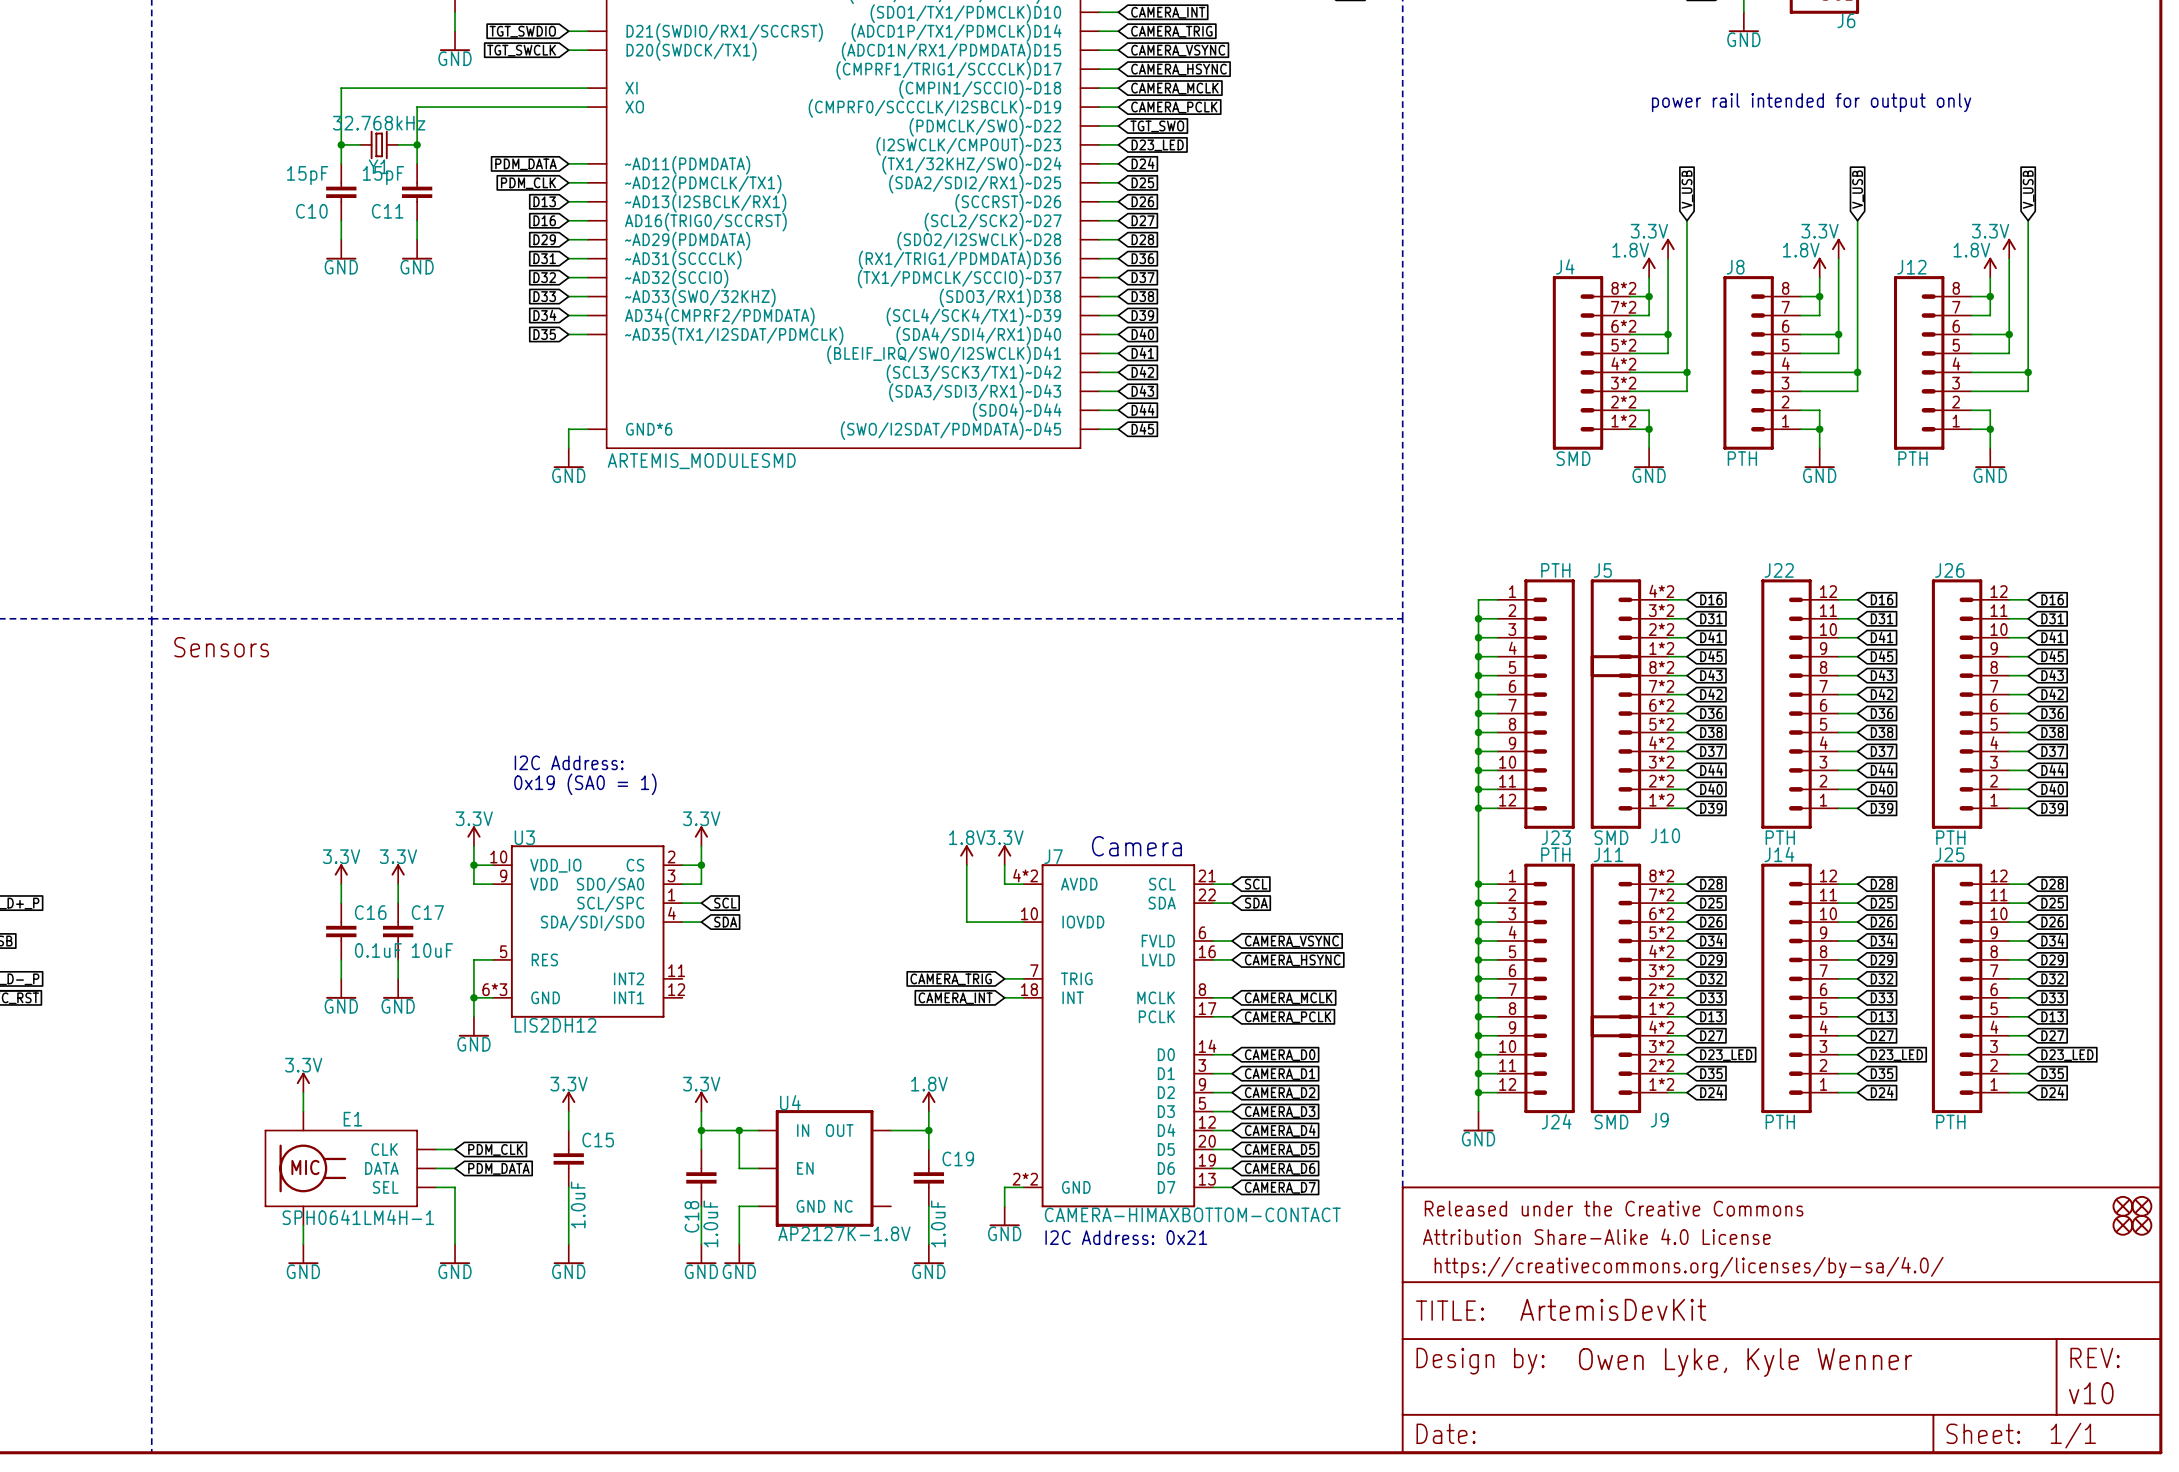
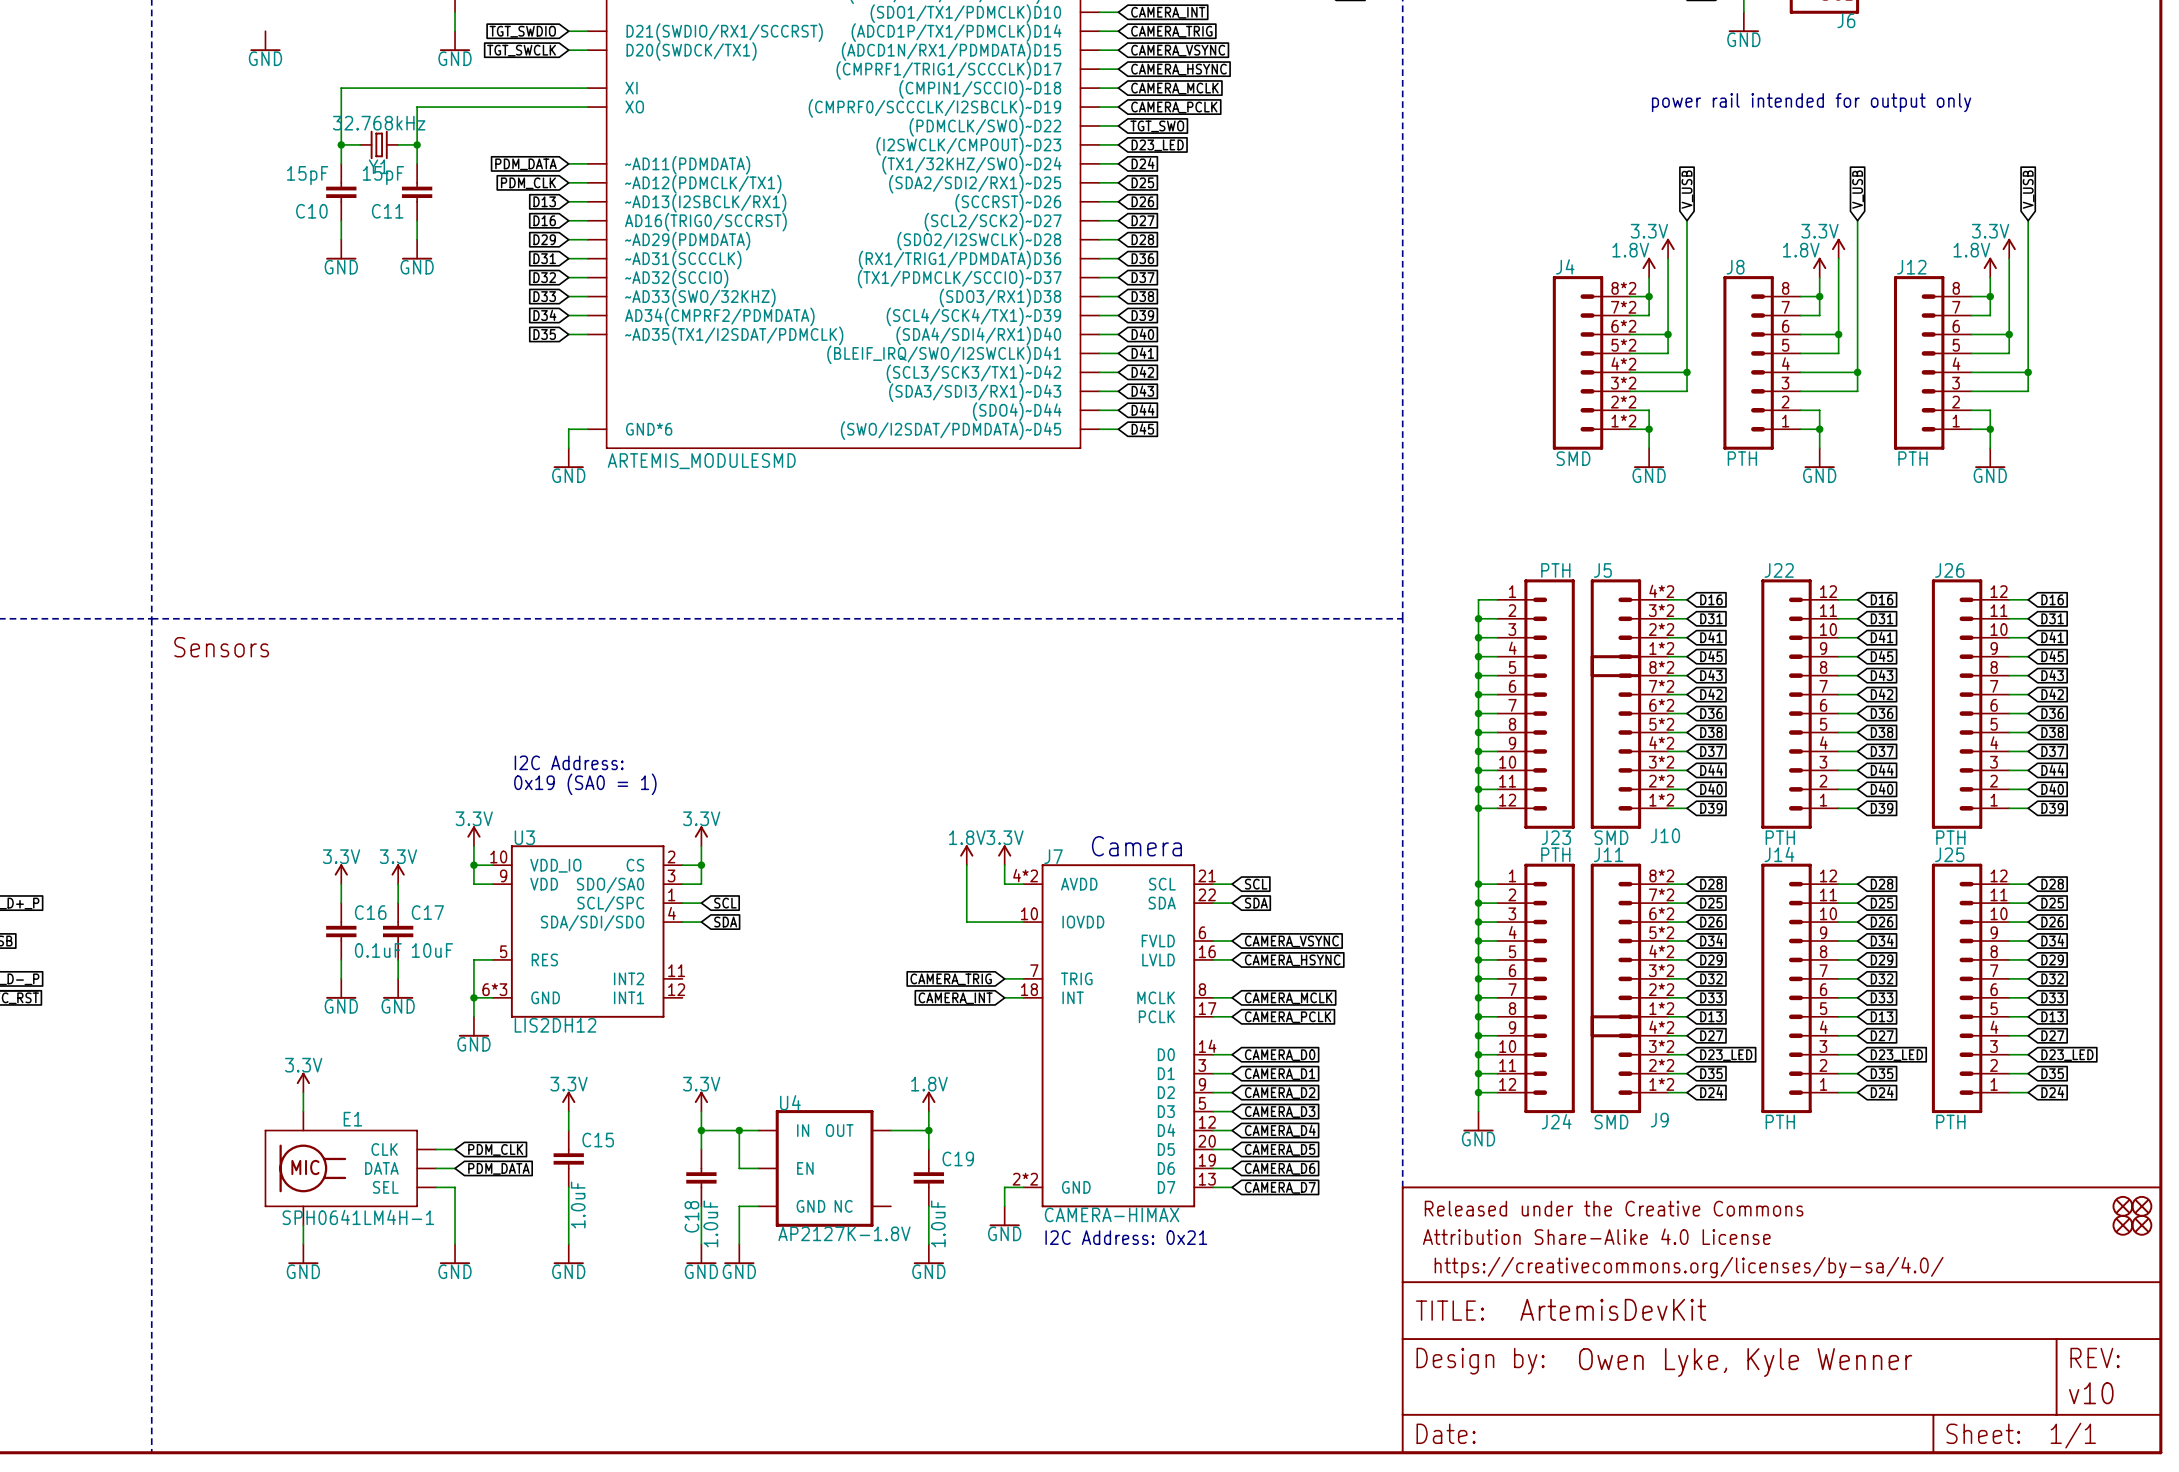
power symbol: none -> GND (265, 41)
J7 value: CAMERA-HIMAXBOTTOM-CONTACT (1192, 1214) -> CAMERA-HIMAX (1112, 1214)

